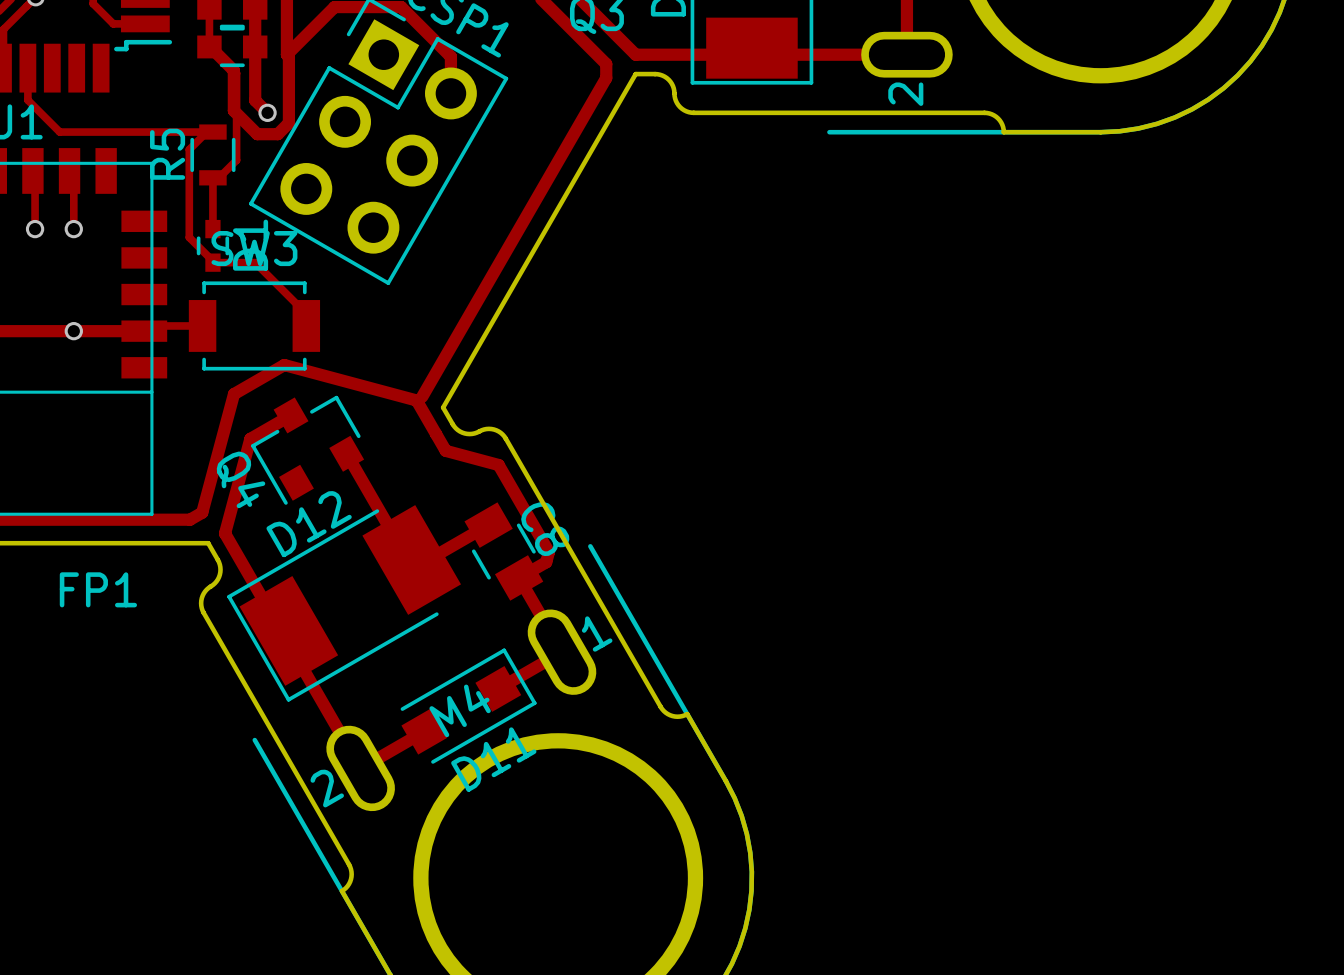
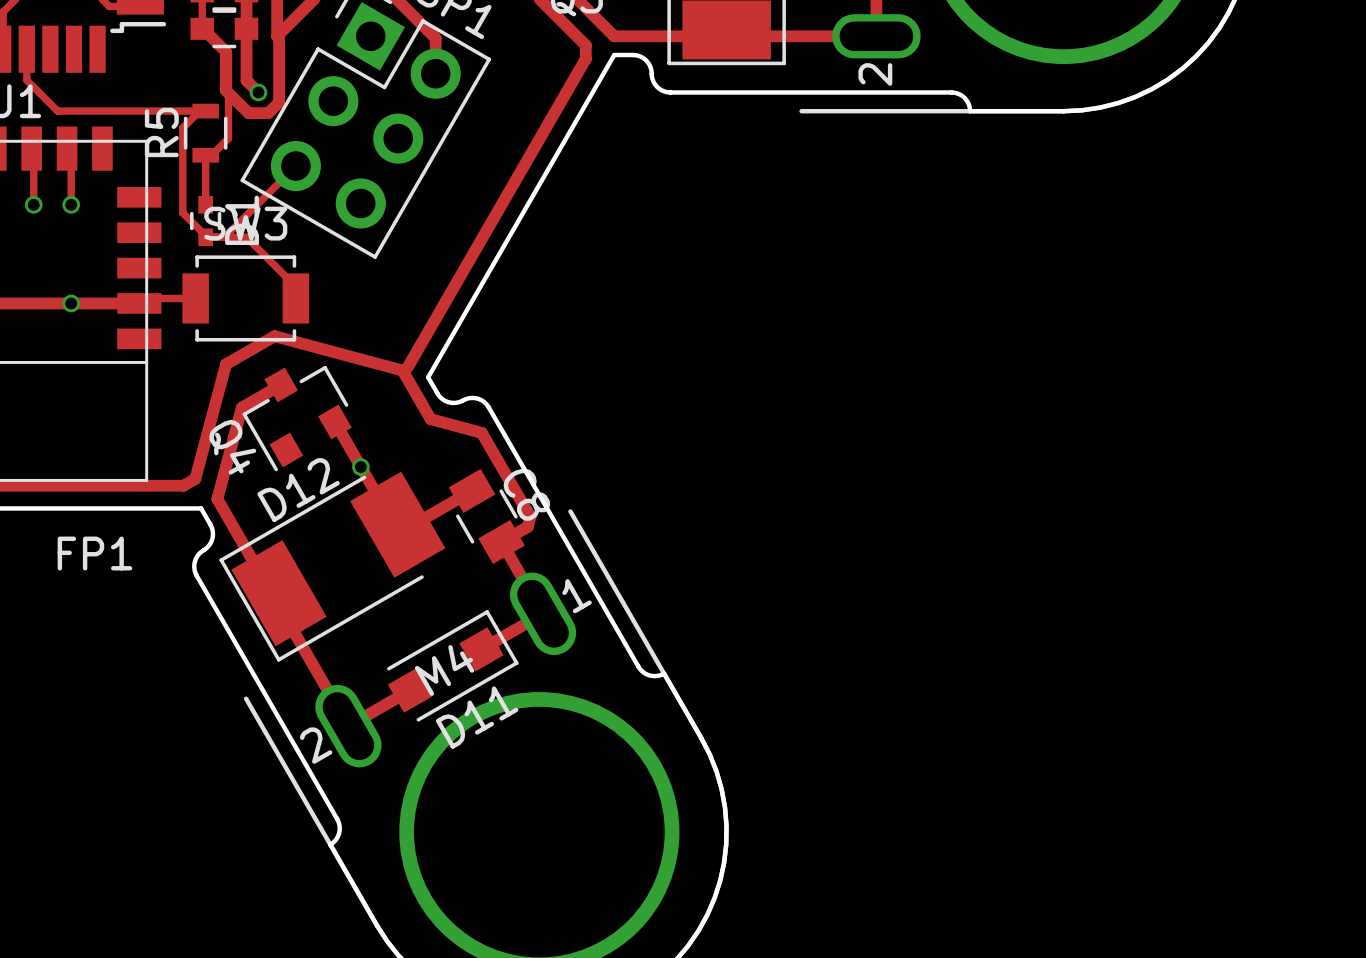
track: none -> (295, 166) (224, 237)
via: none -> (360, 467)

